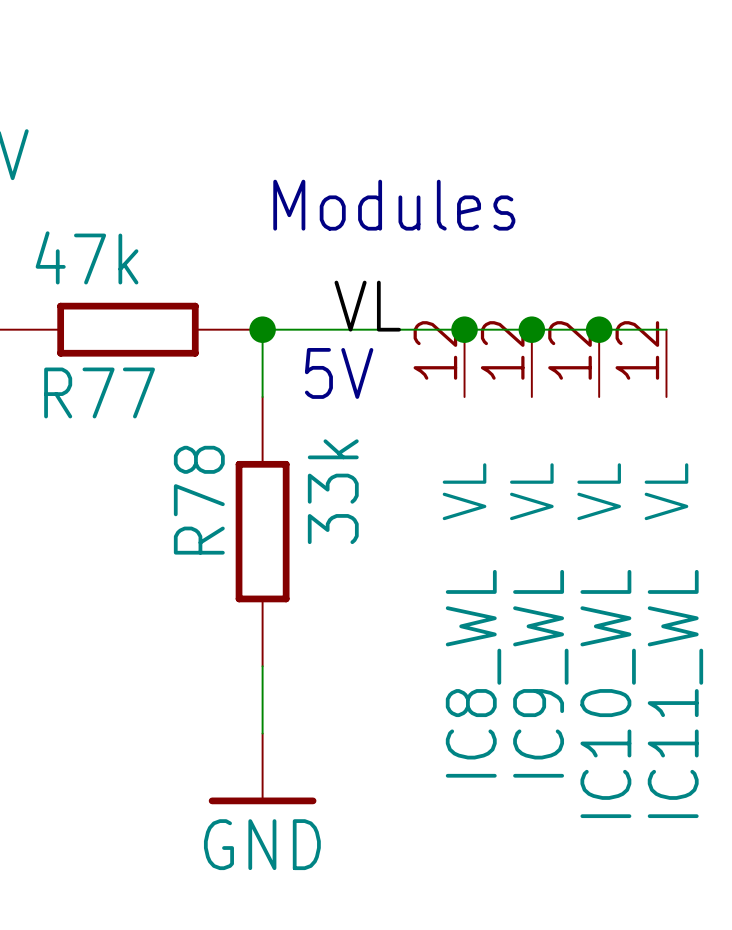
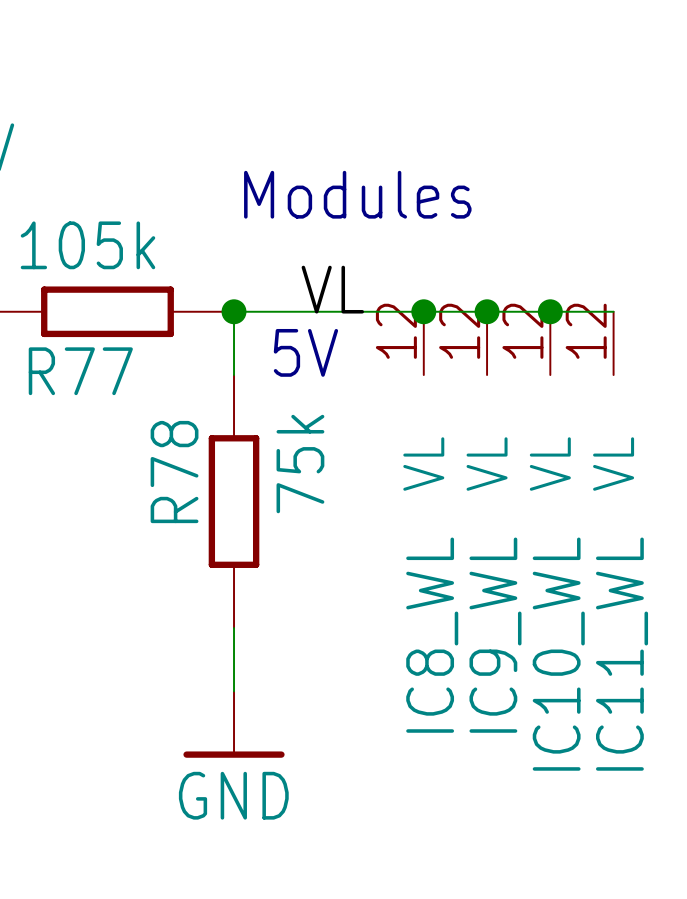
R77 value: 47k (87, 257) -> 105k (87, 245)
R78 value: 33k (333, 491) -> 75k (300, 464)

